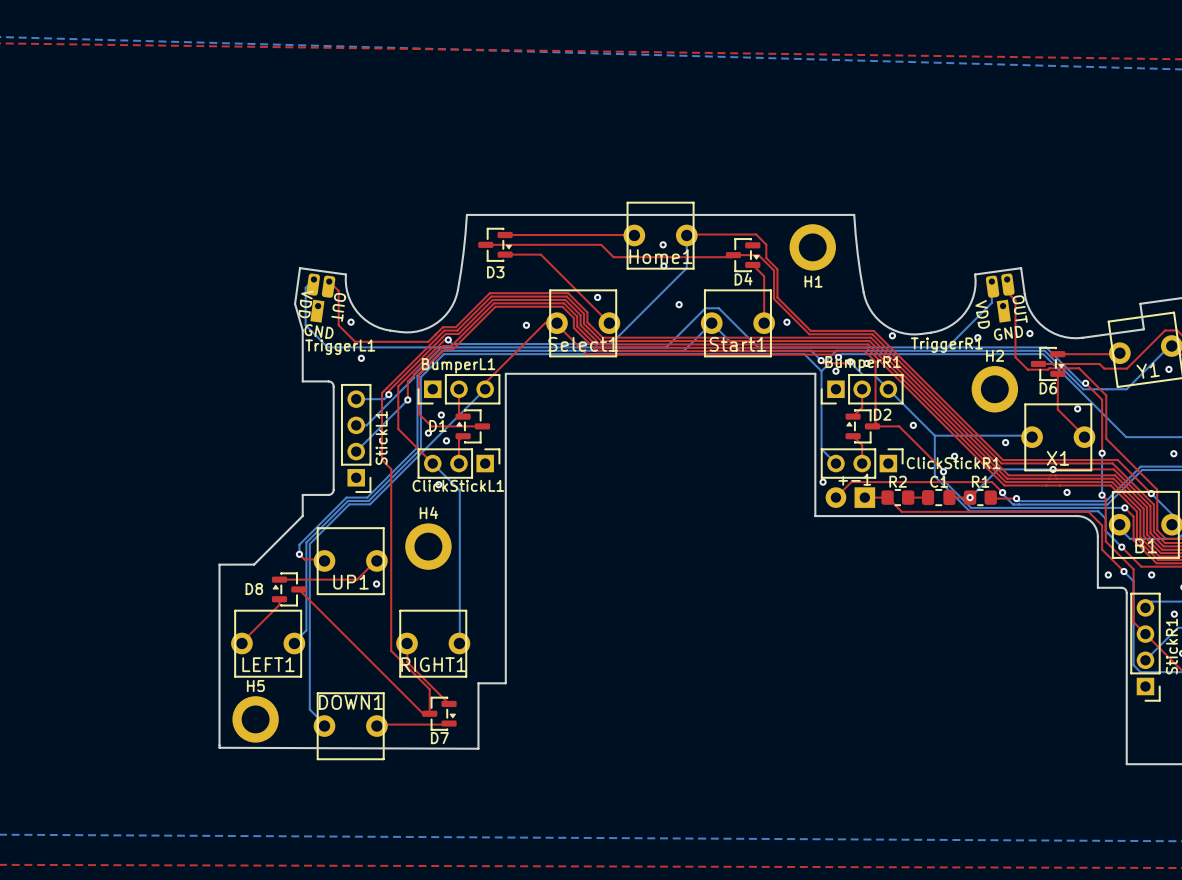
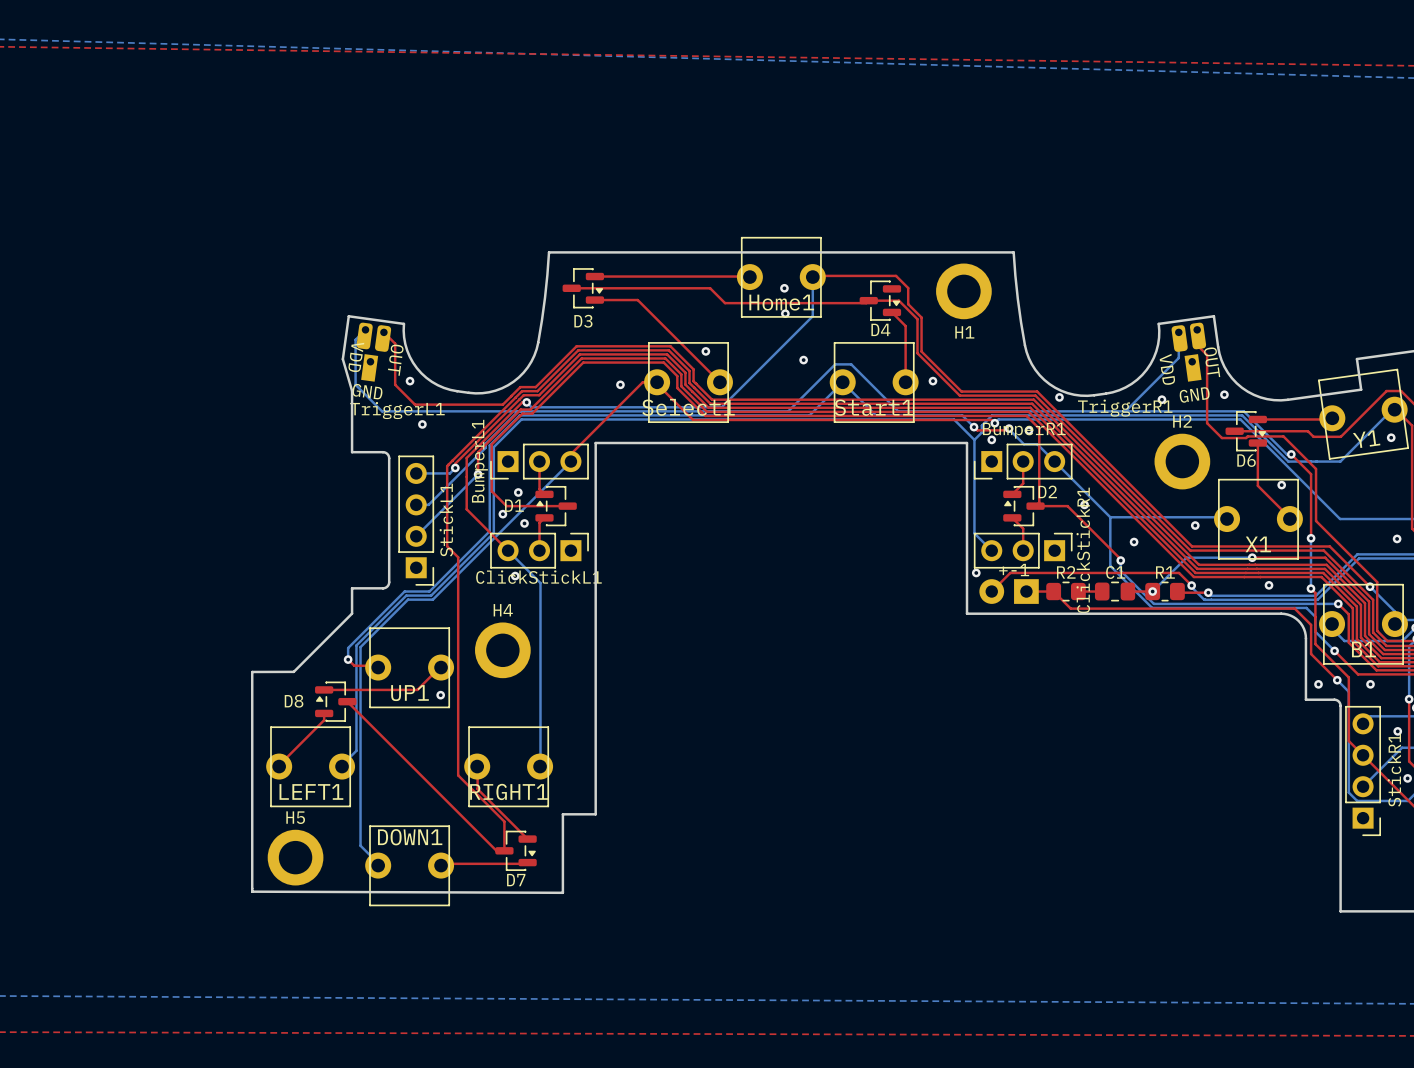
BumperL1 name rotation: 0° (458, 365) -> 90° counterclockwise (479, 461)
ClickStickR1 name rotation: 0° (953, 463) -> 90° counterclockwise (1083, 550)

